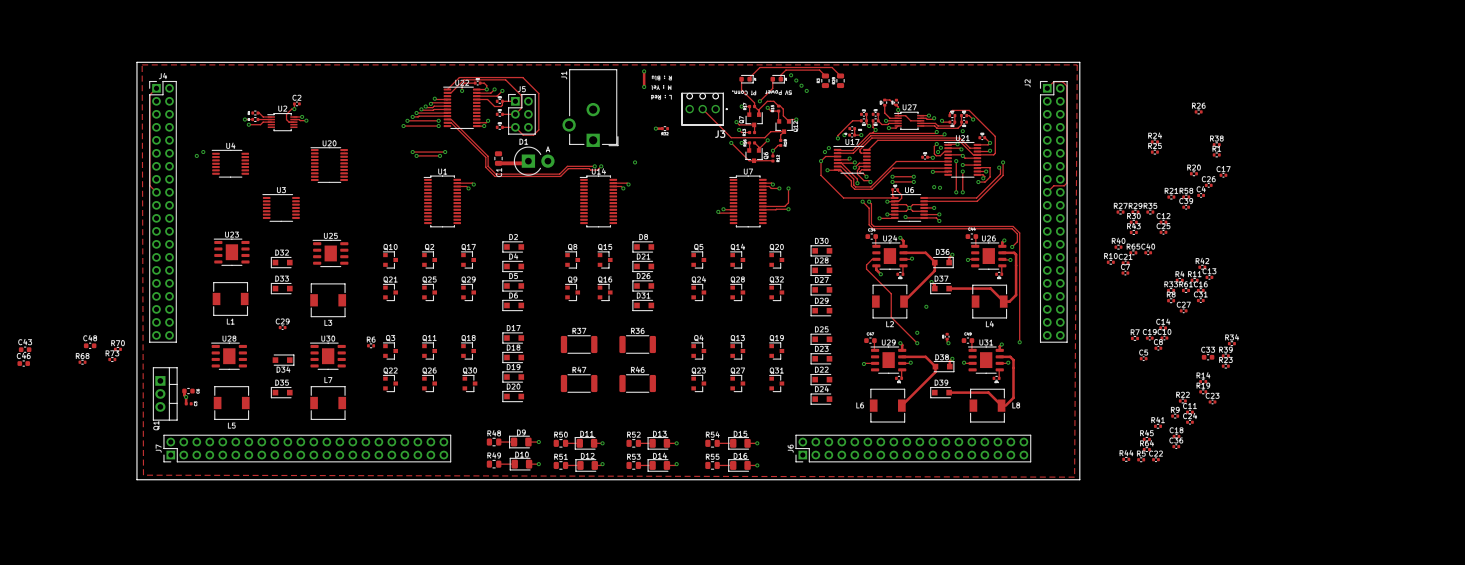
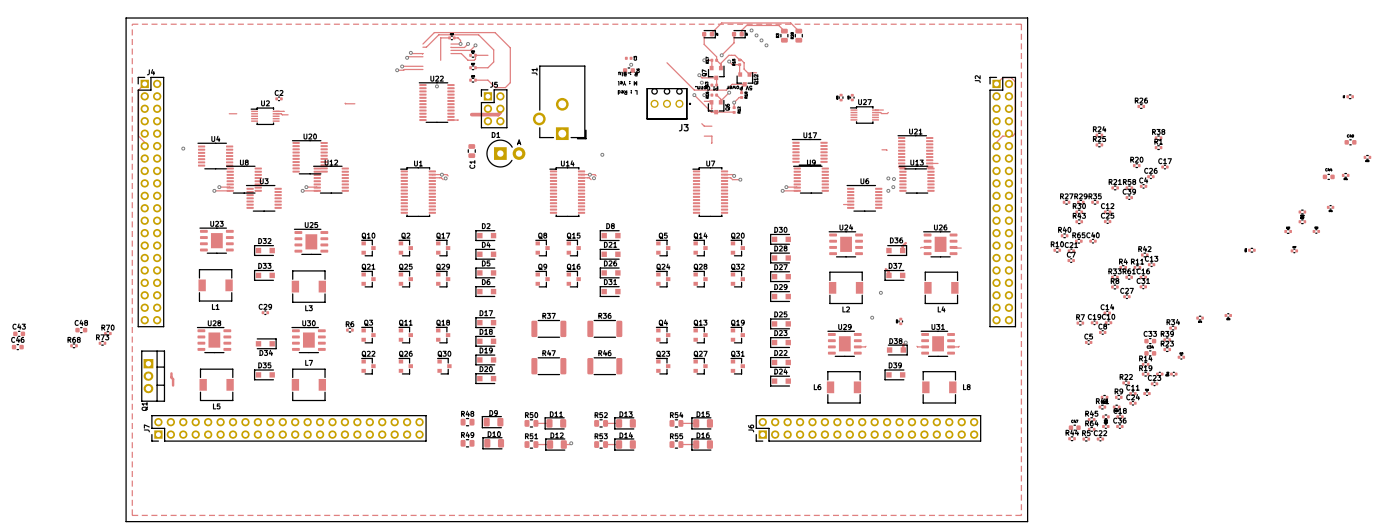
via: none -> (751, 30)
via: none -> (756, 35)
track: none -> (449, 37) (440, 37) (440, 60)
via: none -> (761, 40)
via: none -> (460, 43)
via: none -> (468, 43)
via: none -> (475, 45)
via: none -> (766, 45)
via: none -> (410, 52)
via: none -> (721, 55)
via: none -> (407, 57)
board edge: (136, 62) (1079, 62) -> (126, 59) (126, 18) (1027, 18) (1027, 59)
track: none -> (704, 60) (711, 60) (711, 68)
via: none -> (704, 60)
zone outline: (142, 64) (143, 475) (1074, 477) (1077, 64) (142, 64) -> (132, 24) (132, 515) (1021, 515) (1021, 24) (132, 24)
via: none -> (729, 61)
via: none -> (631, 64)
track: none -> (422, 66) (402, 66)
via: none -> (402, 66)
track: (644, 71) (644, 87) -> none
via: (644, 71) -> none
track: none -> (422, 69) (397, 70)
via: none -> (397, 70)
via: (791, 75) -> none
track: (825, 75) (819, 70) (785, 70) (780, 75) (780, 79) -> (784, 31) (778, 25) (746, 25) (741, 30) (741, 34)
track: (840, 75) (832, 67) (759, 67) (749, 79) -> (798, 31) (790, 22) (721, 22) (711, 34)
via: none -> (699, 75)
track: (741, 79) (741, 89) (754, 102) (754, 106) (759, 110) -> (704, 34) (704, 44) (716, 56) (716, 60) (720, 64)
part position: (746, 79) -> (708, 34)
track: (772, 79) (772, 88) (759, 101) -> (734, 34) (734, 42) (721, 55)
part position: (777, 79) -> (738, 34)
part position: (825, 80) -> (784, 35)
part position: (840, 80) -> (798, 35)
track: (475, 83) (464, 83) (462, 85) (462, 90) -> none
part position: (477, 83) -> (451, 37)
track: (480, 83) (484, 83) (486, 89) (476, 89) -> (454, 37) (458, 37) (460, 43) (450, 44)
via: (801, 85) -> none
via: (644, 87) -> none
via: none -> (701, 82)
track: (447, 89) (459, 77) (522, 77) (538, 93) (538, 129) (533, 135) (523, 135) (515, 127) (502, 127) -> (422, 44) (434, 32) (495, 32) (510, 47) (510, 82) (505, 87) (495, 87) (487, 80) (475, 80)
via: (486, 89) -> none
track: (494, 89) (490, 93) (476, 92) -> (468, 43) (464, 47) (450, 47)
via: (494, 89) -> none
track: (502, 90) (497, 96) (476, 96) -> (475, 45) (470, 50) (450, 50)
via: (502, 90) -> none
via: (806, 90) -> none
track: (447, 92) (451, 92) (464, 79) (505, 79) (521, 95) (521, 108) (515, 114) (502, 114) -> (422, 47) (426, 47) (438, 34) (478, 34) (493, 49) (493, 61) (487, 67) (475, 67)
via: none -> (729, 92)
track: (434, 98) (446, 100) -> (410, 52) (422, 54)
via: (434, 98) -> none
track: (476, 99) (487, 99) (494, 106) (501, 106) (502, 101) (515, 101) -> (450, 53) (461, 53) (468, 60) (474, 60) (475, 55) (487, 55)
via: none -> (694, 95)
via: none -> (704, 95)
track: (884, 100) (889, 100) (898, 106) (898, 115) (905, 115) (910, 120) (920, 120) -> none
part position: (499, 101) -> (473, 55)
via: (759, 101) -> none
track: (447, 102) (430, 103) -> (422, 56) (407, 57)
track: (294, 103) (294, 108) (286, 114) (286, 119) (289, 122) (293, 122) -> none
via: (430, 103) -> none
track: (884, 105) (884, 113) (889, 118) (898, 118) -> none
via: (425, 106) -> none
track: (447, 106) (425, 106) -> none
via: (741, 106) -> none
part position: (752, 106) -> (714, 60)
track: (767, 107) (770, 111) (778, 111) (779, 121) -> (729, 61) (732, 64) (739, 64) (740, 74)
via: (767, 107) -> none
via: none -> (734, 102)
track: none -> (345, 103) (354, 103)
part position: (778, 108) -> (739, 62)
via: (294, 109) -> none
track: (421, 109) (447, 109) -> none
via: (421, 109) -> none
track: (702, 109) (731, 137) (764, 137) (770, 131) (784, 131) (780, 135) (780, 140) -> (667, 62) (694, 90) (726, 90) (732, 84) (744, 84) (741, 87) (741, 92)
via: (898, 109) -> none
track: (447, 112) (416, 113) -> none
part position: (255, 113) -> (1251, 250)
track: (257, 113) (263, 117) (271, 117) -> none
via: (416, 113) -> none
part position: (499, 114) -> (473, 67)
track: (759, 114) (759, 109) (767, 101) (773, 101) (783, 109) (783, 115) (788, 121) (796, 119) -> (720, 68) (720, 63) (728, 55) (735, 55) (744, 62) (744, 69) (749, 74) (756, 72)
part position: (863, 114) -> (1147, 393)
track: (866, 114) (866, 123) (869, 126) -> none
part position: (875, 114) -> (1294, 250)
track: (878, 114) (878, 120) (881, 124) (898, 123) -> none
via: (928, 115) -> none
track: (949, 115) (952, 110) (969, 110) (995, 136) (995, 153) (973, 154) (958, 140) (877, 140) (866, 149) -> none
part position: (952, 115) -> (1302, 221)
track: (954, 115) (954, 123) (952, 125) (920, 123) -> none
track: (961, 115) (961, 124) (957, 128) (920, 125) -> none
part position: (964, 115) -> (1288, 231)
track: (966, 115) (973, 119) -> none
via: (302, 116) -> none
via: (412, 116) -> none
track: (447, 116) (412, 116) -> none
via: (934, 118) -> none
via: (244, 119) -> none
part position: (255, 119) -> (1350, 96)
track: (257, 119) (271, 119) -> none
track: (447, 119) (451, 119) (488, 156) (488, 166) (495, 174) (559, 174) (567, 166) (594, 166) -> none
part position: (754, 119) -> (716, 72)
via: (796, 119) -> none
via: (973, 119) -> none
via: (306, 120) -> none
track: (407, 120) (438, 120) -> none
via: (407, 120) -> none
via: (438, 120) -> none
track: (488, 120) (486, 122) (476, 122) -> none
via: (488, 120) -> none
track: (861, 120) (852, 120) (837, 135) (837, 139) -> none
part position: (863, 120) -> (1367, 157)
track: (873, 120) (873, 127) (875, 129) (872, 133) -> none
part position: (875, 120) -> (1116, 407)
track: (886, 120) (898, 120) -> none
via: (886, 120) -> none
track: (941, 120) (949, 122) -> none
via: (941, 120) -> none
track: (271, 122) (248, 124) -> none
track: (447, 122) (451, 122) (485, 157) (485, 167) (494, 176) (560, 176) (568, 168) (597, 170) (601, 166) -> none
track: (736, 122) (739, 124) (754, 124) (754, 132) -> (699, 75) (701, 77) (716, 77) (716, 85)
via: (736, 122) -> none
part position: (952, 122) -> (1330, 207)
part position: (964, 122) -> (1228, 315)
via: (248, 124) -> none
track: (898, 125) (896, 128) (888, 128) -> none
track: (403, 126) (438, 126) -> none
via: (403, 126) -> none
via: (438, 126) -> none
via: (484, 126) -> none
part position: (784, 126) -> (744, 79)
via: (869, 126) -> none
part position: (499, 127) -> (473, 80)
track: (655, 128) (662, 128) -> none
via: (655, 128) -> none
part position: (664, 128) -> (1104, 397)
part position: (852, 128) -> (1159, 374)
track: (854, 128) (854, 135) (861, 135) -> none
via: (888, 128) -> none
via: (739, 129) -> none
via: (875, 129) -> none
via: (962, 131) -> none
part position: (752, 132) -> (714, 85)
track: (936, 132) (869, 133) (852, 150) (837, 149) -> none
via: (936, 132) -> none
track: (944, 134) (870, 135) (853, 153) (837, 153) -> none
via: (944, 134) -> none
via: (844, 135) -> none
part position: (852, 135) -> (1173, 374)
via: (861, 135) -> none
part position: (982, 137) -> (1316, 231)
track: (984, 137) (990, 142) (988, 144) (977, 144) -> none
via: (837, 138) -> none
track: (767, 140) (758, 149) -> (729, 92) (720, 101)
via: (767, 140) -> none
track: (1066, 140) (1066, 183) (1064, 185) (1053, 185) (1047, 192) -> (1015, 133) (1012, 136) (1002, 136) (996, 142)
track: (149, 142) (149, 185) (156, 192) -> (138, 136) (144, 142)
track: (731, 142) (749, 160) (772, 161) -> (694, 95) (711, 112) (734, 112)
via: (731, 142) -> none
via: (741, 142) -> none
part position: (752, 142) -> (714, 95)
track: (754, 142) (758, 147) (758, 150) -> (716, 95) (720, 99) (720, 102)
part position: (780, 142) -> (741, 95)
via: (990, 142) -> none
track: (936, 144) (934, 146) (936, 155) (948, 151) -> none
via: (936, 144) -> none
track: (957, 144) (948, 144) -> none
via: (957, 144) -> none
track: (780, 145) (772, 150) (772, 156) -> (741, 97) (734, 102) (734, 107)
via: (940, 147) -> none
via: (828, 148) -> none
track: (948, 148) (961, 149) -> none
track: (977, 148) (969, 148) (959, 138) (871, 138) (860, 149) (861, 153) (866, 153) -> none
via: (961, 149) -> none
via: (772, 150) -> none
track: (990, 150) (977, 151) -> none
via: (990, 150) -> none
via: (203, 152) -> none
track: (412, 152) (445, 152) -> none
via: (412, 152) -> none
via: (445, 152) -> none
via: (824, 152) -> none
via: (938, 152) -> none
track: (948, 154) (961, 154) (965, 158) (977, 158) -> none
track: (416, 155) (439, 155) -> none
via: (416, 155) -> none
via: (439, 155) -> none
part position: (754, 155) -> (716, 107)
via: (962, 155) -> none
track: (837, 156) (825, 156) (821, 161) (821, 175) (843, 197) (894, 197) (892, 195) (892, 189) -> none
part position: (925, 157) -> (1105, 426)
via: (932, 157) -> none
part position: (772, 158) -> (734, 110)
track: (849, 158) (837, 159) -> none
via: (849, 158) -> none
track: (528, 161) (526, 163) (498, 163) -> (500, 112) (498, 114) (471, 114)
via: (821, 161) -> none
track: (948, 161) (896, 161) (870, 186) (855, 186) (853, 179) (841, 166) (837, 166) -> none
track: (956, 161) (956, 192) -> none
via: (956, 161) -> none
track: (854, 162) (837, 163) -> none
via: (854, 162) -> none
track: (1003, 162) (1003, 175) (977, 201) (924, 201) -> none
via: (1003, 162) -> none
track: (841, 163) (857, 179) (857, 183) -> none
track: (866, 163) (859, 163) (854, 167) -> none
track: (977, 164) (962, 165) -> none
via: (962, 165) -> none
via: (594, 166) -> none
via: (601, 166) -> none
track: (866, 166) (859, 166) (857, 174) (863, 180) (870, 181) -> none
via: (854, 167) -> none
track: (999, 167) (1000, 174) (976, 197) (924, 197) -> none
via: (999, 167) -> none
track: (948, 168) (892, 168) (871, 189) (854, 189) (851, 185) (851, 181) (841, 170) (827, 170) -> none
track: (977, 168) (990, 167) (990, 177) (985, 182) (978, 182) -> none
track: (866, 169) (860, 171) (860, 173) (866, 176) -> none
via: (827, 170) -> none
via: (932, 171) -> none
track: (951, 171) (932, 171) -> none
track: (962, 171) (962, 192) -> none
via: (962, 171) -> none
via: (986, 171) -> none
track: (977, 174) (982, 174) (984, 176) (983, 178) -> none
via: (866, 176) -> none
track: (892, 176) (913, 176) -> none
via: (892, 176) -> none
via: (913, 176) -> none
via: (983, 178) -> none
via: (870, 181) -> none
track: (892, 181) (913, 181) -> none
via: (892, 181) -> none
via: (913, 181) -> none
via: (978, 182) -> none
via: none -> (441, 174)
via: none -> (589, 174)
via: (857, 183) -> none
via: (473, 184) -> none
via: (628, 184) -> none
via: none -> (593, 178)
via: none -> (445, 178)
part: none -> (244, 179)
part: none -> (331, 179)
via: (468, 188) -> none
via: (623, 188) -> none
track: (788, 188) (788, 202) (784, 206) (762, 206) -> none
via: (788, 188) -> none
part: none -> (811, 179)
part: none -> (916, 179)
part position: (895, 189) -> (1181, 357)
track: (897, 189) (901, 198) (898, 201) (887, 201) -> none
via: (956, 192) -> none
via: (962, 192) -> none
track: none -> (219, 187) (230, 187)
via: none -> (219, 187)
track: none -> (306, 187) (317, 187)
via: none -> (306, 187)
track: none -> (786, 187) (797, 187)
via: none -> (786, 187)
via: none -> (893, 187)
track: none -> (214, 190) (230, 190)
via: none -> (214, 190)
track: none -> (302, 190) (317, 190)
via: none -> (302, 190)
track: none -> (782, 190) (797, 190)
via: none -> (782, 190)
via: none -> (888, 190)
track: (862, 201) (869, 208) (869, 224) (873, 228) (1012, 228) (1017, 233) (1017, 241) (1012, 246) -> none
via: (862, 201) -> none
track: (869, 201) (871, 203) (871, 223) (873, 226) (1013, 226) (1019, 233) (1019, 342) -> none
via: (869, 201) -> none
via: (887, 201) -> none
track: (894, 204) (906, 204) (912, 211) (924, 211) -> none
track: (924, 204) (912, 204) (906, 211) (894, 211) -> none
via: (909, 207) -> none
track: (924, 207) (934, 207) -> none
via: (934, 207) -> none
track: (723, 209) (733, 209) -> none
via: (723, 209) -> none
track: (788, 209) (762, 209) -> none
via: (788, 209) -> none
track: (718, 211) (733, 213) -> none
via: (718, 211) -> none
via: (887, 214) -> none
track: (939, 214) (924, 214) -> none
via: (939, 214) -> none
track: (894, 217) (879, 218) -> none
track: (905, 217) (936, 217) (939, 220) -> none
via: (905, 217) -> none
via: (879, 218) -> none
via: (939, 220) -> none
part position: (871, 236) -> (1150, 353)
track: (875, 236) (876, 246) -> none
part position: (971, 236) -> (1328, 176)
track: (975, 236) (975, 246) -> none
track: (900, 237) (903, 241) (903, 246) -> none
via: (900, 237) -> none
track: (1004, 240) (1002, 246) -> none
via: (1004, 240) -> none
via: (1012, 246) -> none
track: (903, 252) (925, 252) (934, 261) (934, 270) (904, 301) -> none
track: (1002, 252) (1014, 252) (1016, 254) (1016, 295) (1009, 301) (1003, 301) -> none
via: (952, 254) -> none
track: (912, 258) (903, 259) -> none
via: (912, 258) -> none
track: (876, 259) (872, 259) (866, 265) (866, 269) (891, 293) (891, 317) (917, 343) -> none
via: (967, 259) -> none
via: (1010, 259) -> none
track: (876, 265) (876, 269) (880, 274) -> none
track: (903, 265) (902, 274) -> none
track: (1002, 265) (1001, 274) -> none
via: (880, 274) -> none
part position: (900, 274) -> (1105, 416)
part position: (999, 274) -> (1302, 212)
via: (931, 282) -> none
track: (949, 288) (990, 288) (1003, 301) -> none
track: (947, 339) (948, 343) -> none
part position: (870, 340) -> (1074, 427)
track: (874, 340) (875, 350) -> none
part position: (967, 340) -> (1350, 142)
track: (971, 340) (972, 350) -> none
via: (1019, 342) -> none
track: (900, 343) (902, 350) -> none
via: (900, 343) -> none
via: (917, 343) -> none
via: (948, 343) -> none
track: (1001, 344) (999, 350) -> none
via: (1001, 344) -> none
track: (902, 356) (925, 356) (935, 366) (935, 372) (901, 405) -> none
track: (999, 356) (1010, 356) (1013, 360) (1013, 397) (1005, 405) (1001, 405) (988, 392) (949, 392) -> none
via: (910, 362) -> none
via: (964, 362) -> none
via: (1008, 362) -> none
track: (875, 363) (863, 364) -> none
via: (863, 364) -> none
track: (902, 369) (901, 378) -> none
track: (999, 369) (999, 378) -> none
part position: (899, 378) -> (1345, 175)
part position: (996, 378) -> (1200, 318)
part position: (188, 391) -> (628, 70)
via: (186, 397) -> none
part position: (188, 403) -> (628, 58)
track: (498, 442) (514, 442) -> none
track: (528, 442) (538, 442) -> none
via: (538, 442) -> none
track: (594, 443) (602, 443) -> none
via: (602, 443) -> none
track: (666, 443) (676, 443) -> none
via: (676, 443) -> none
track: (747, 443) (757, 443) -> none
via: (757, 443) -> none
track: (498, 464) (514, 464) -> none
track: (529, 464) (538, 464) -> none
via: (538, 464) -> none
track: (676, 464) (666, 465) -> none
via: (676, 464) -> none
track: (747, 465) (757, 465) -> none
via: (757, 465) -> none
board edge: (136, 479) (1079, 479) -> (126, 458) (126, 521) (1027, 521) (1027, 458)

